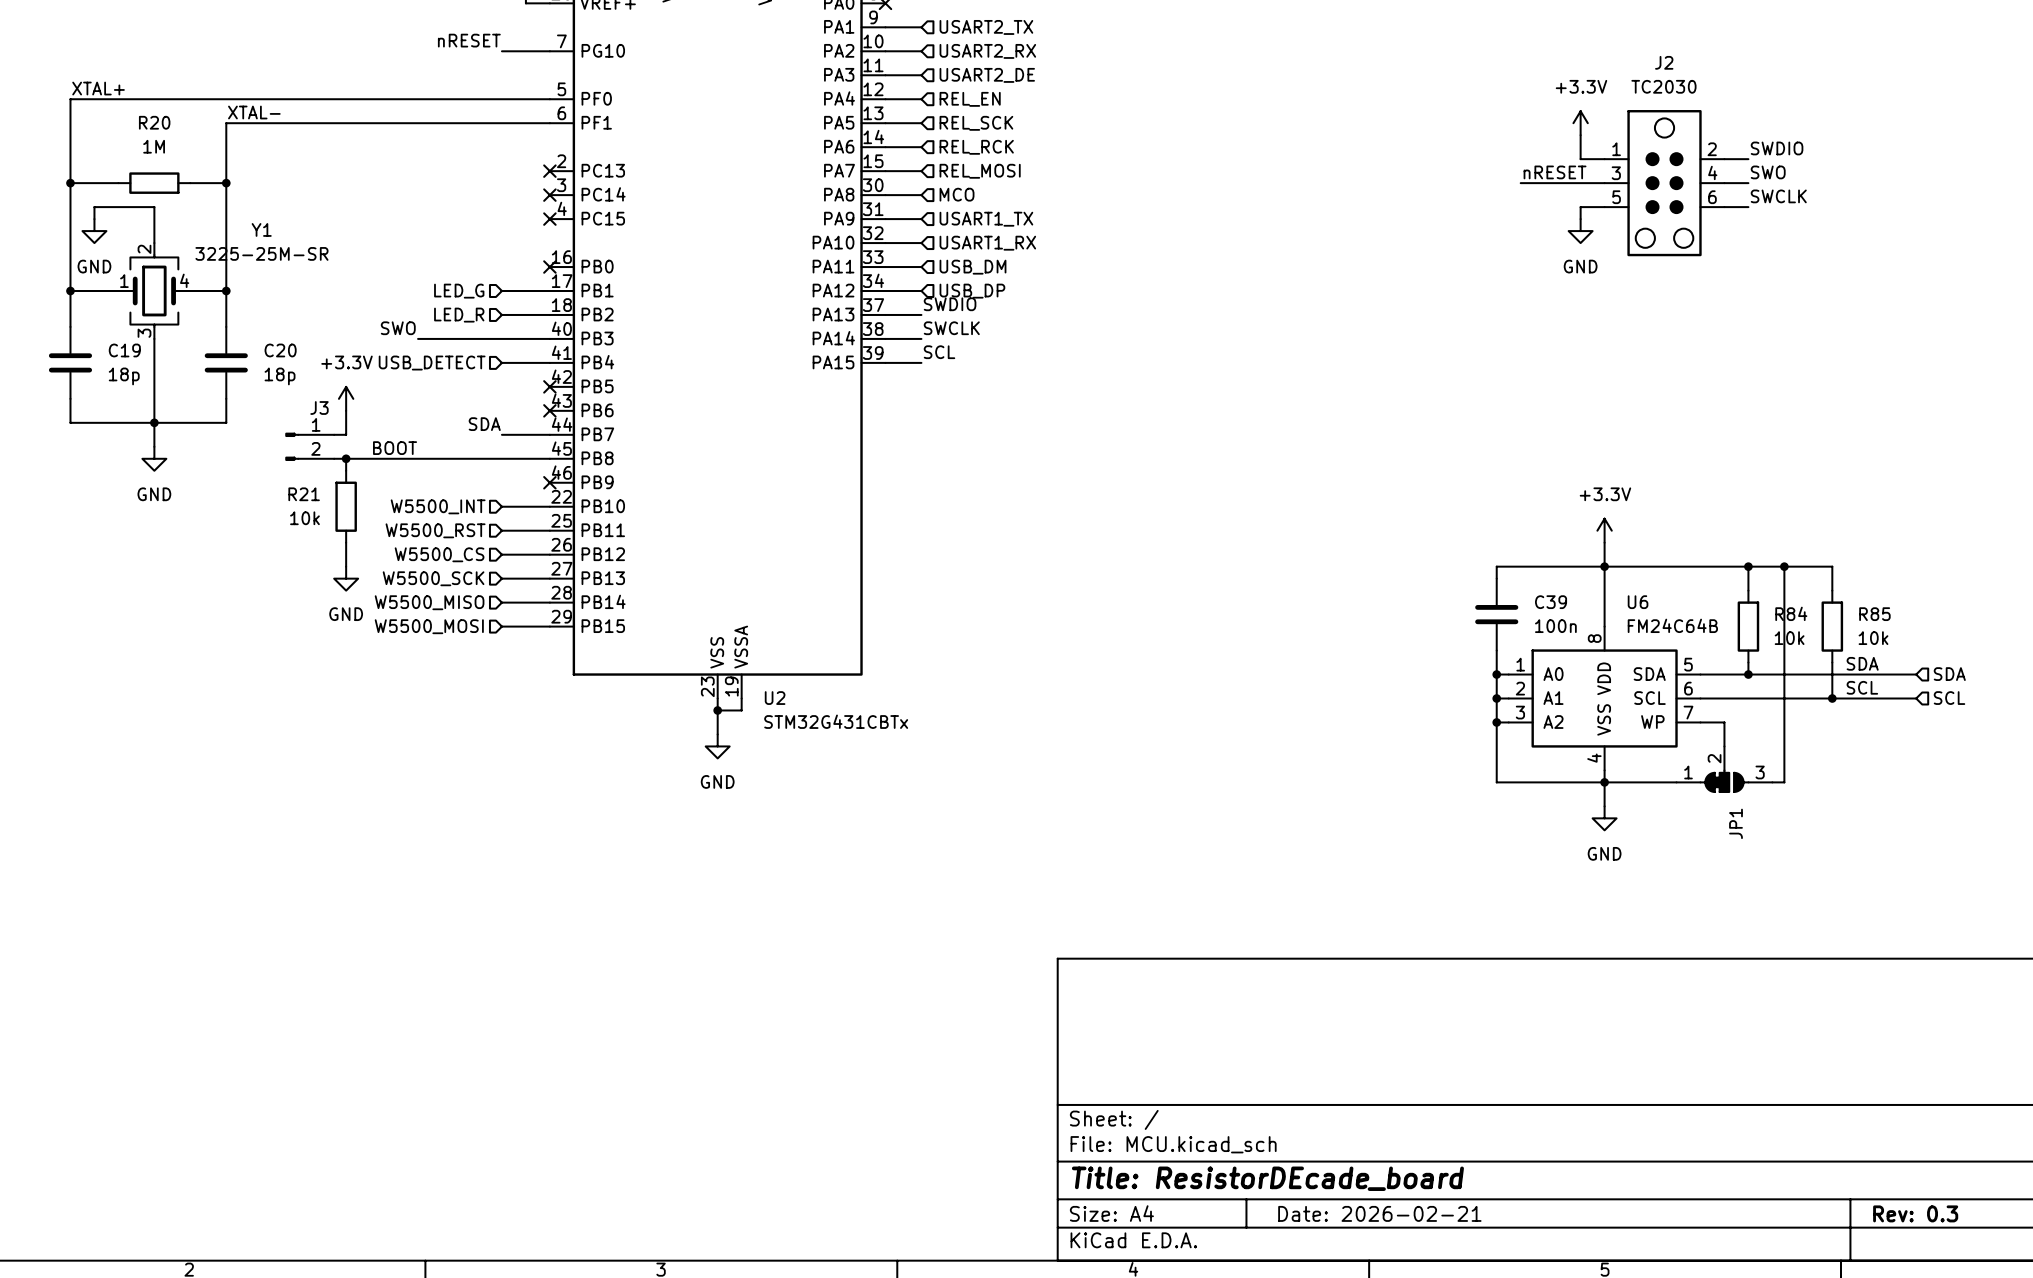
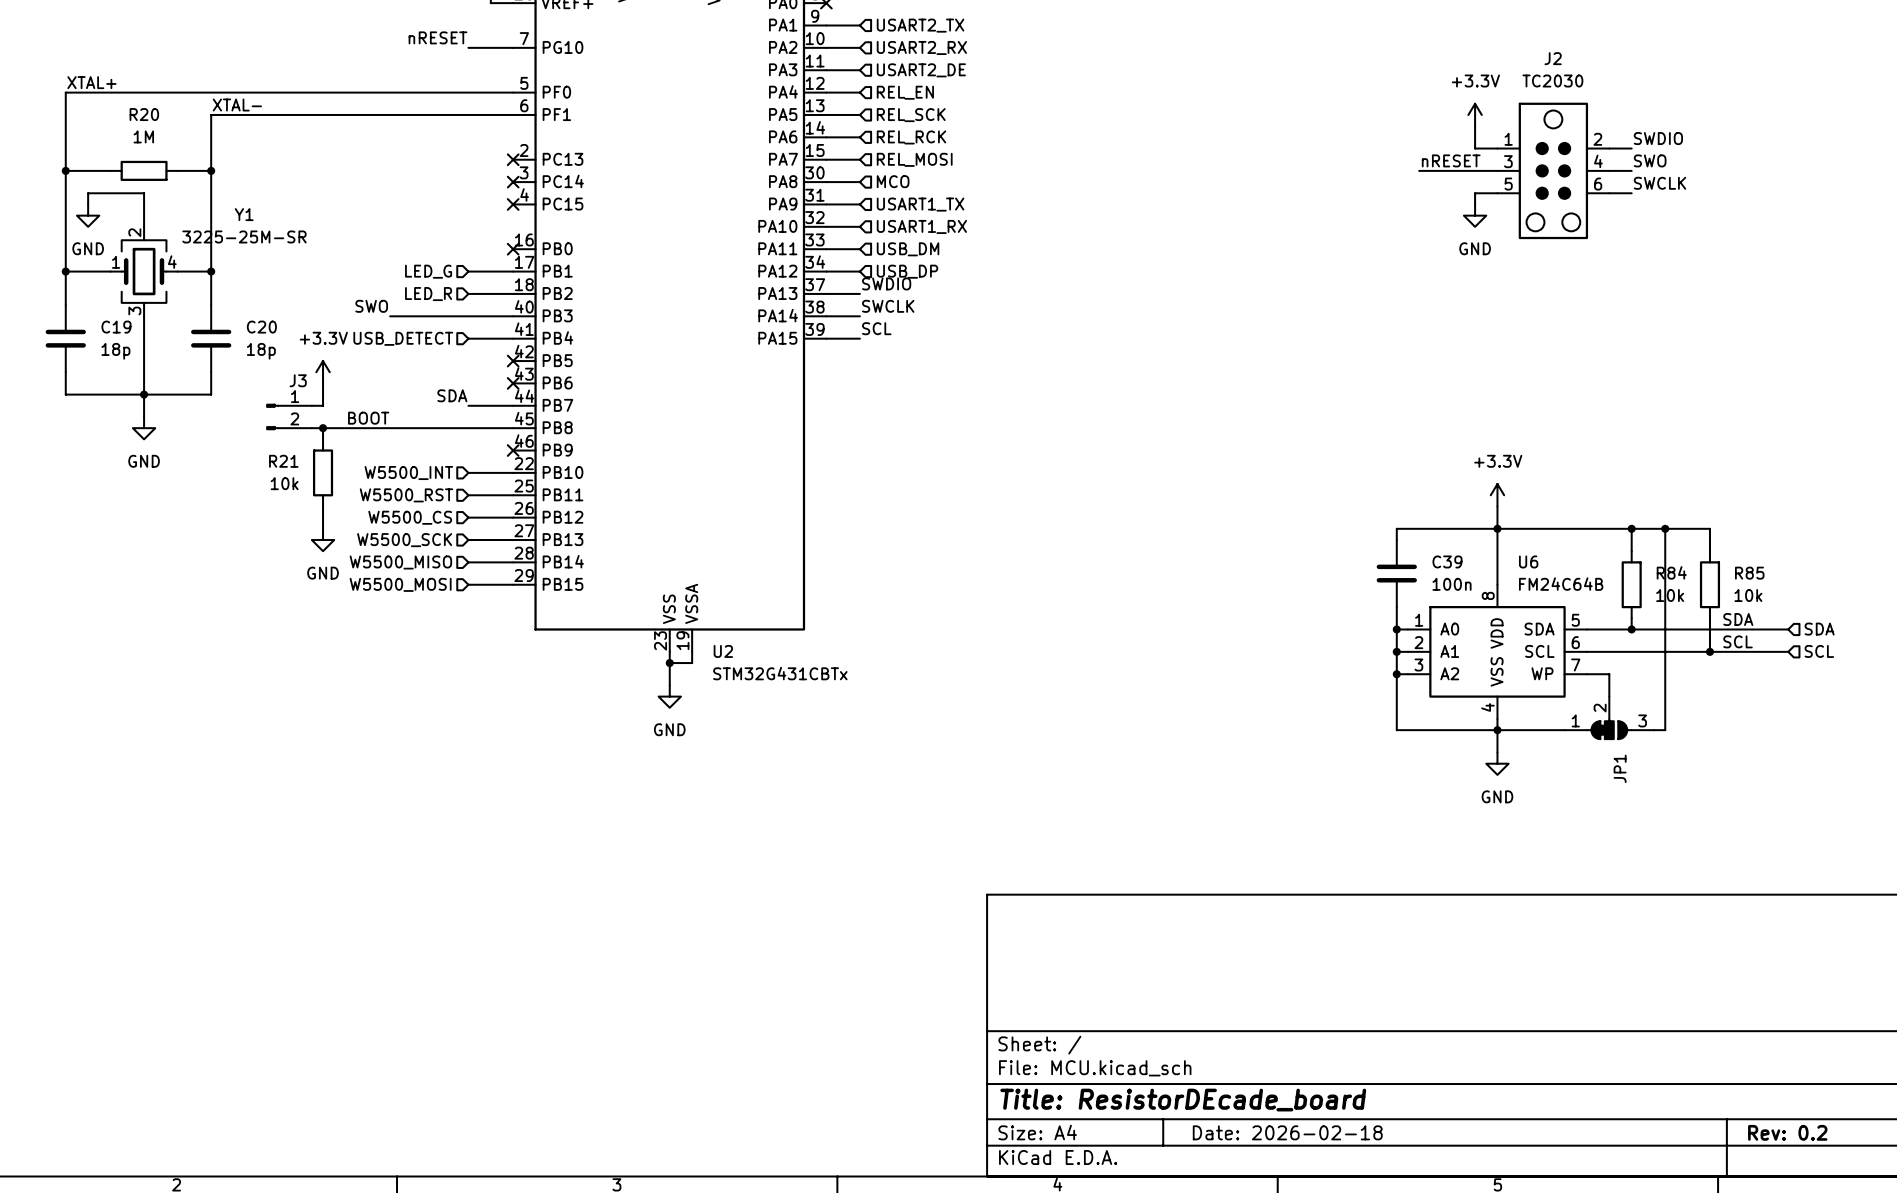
title block: Date: 2026-02-21 (1379, 1213) -> Date: 2026-02-18 (1287, 1132)
title block: Rev: 0.3 (1915, 1213) -> Rev: 0.2 (1787, 1132)

